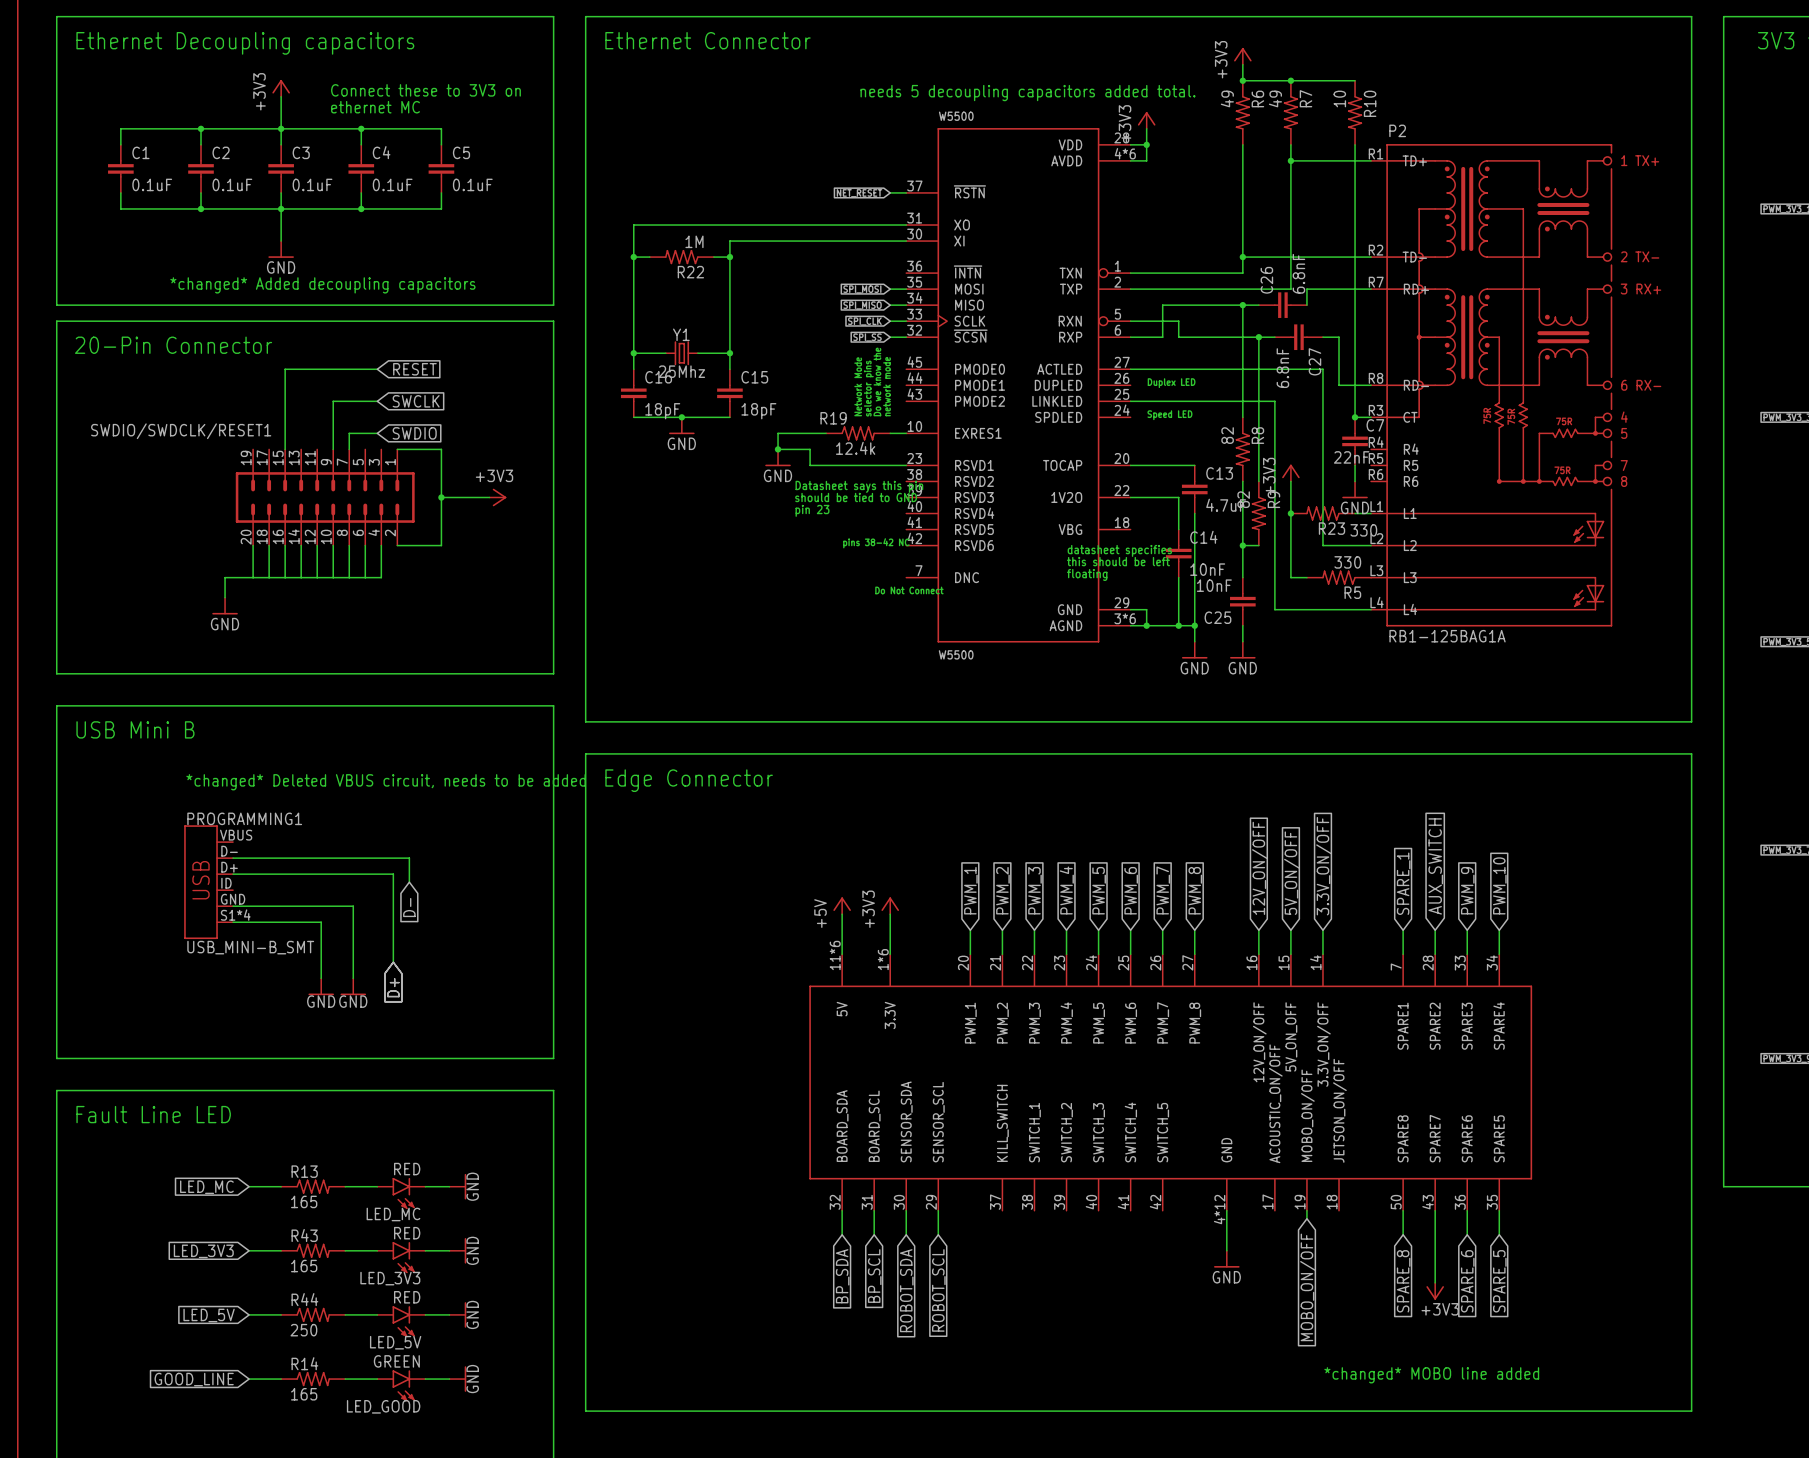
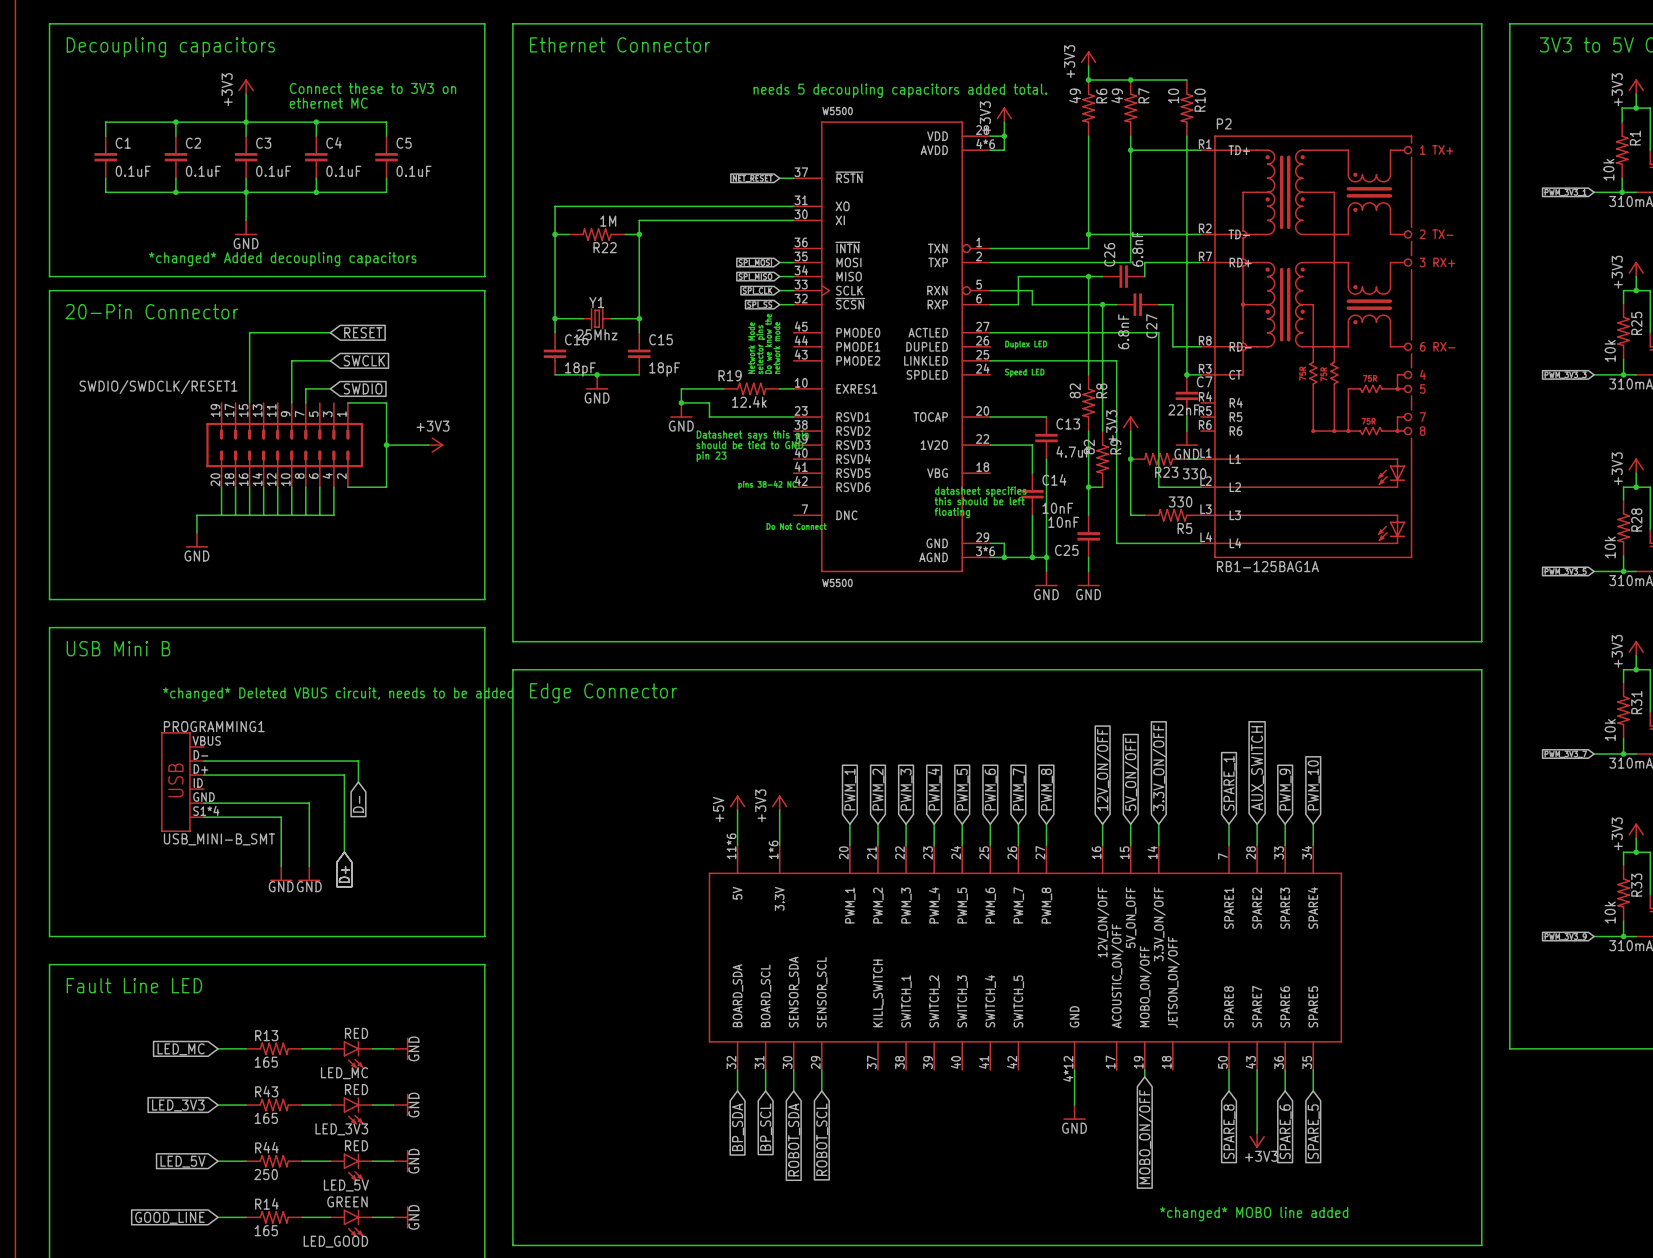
text: Ethernet Decoupling capacitors (245, 43) -> Decoupling capacitors (170, 47)

